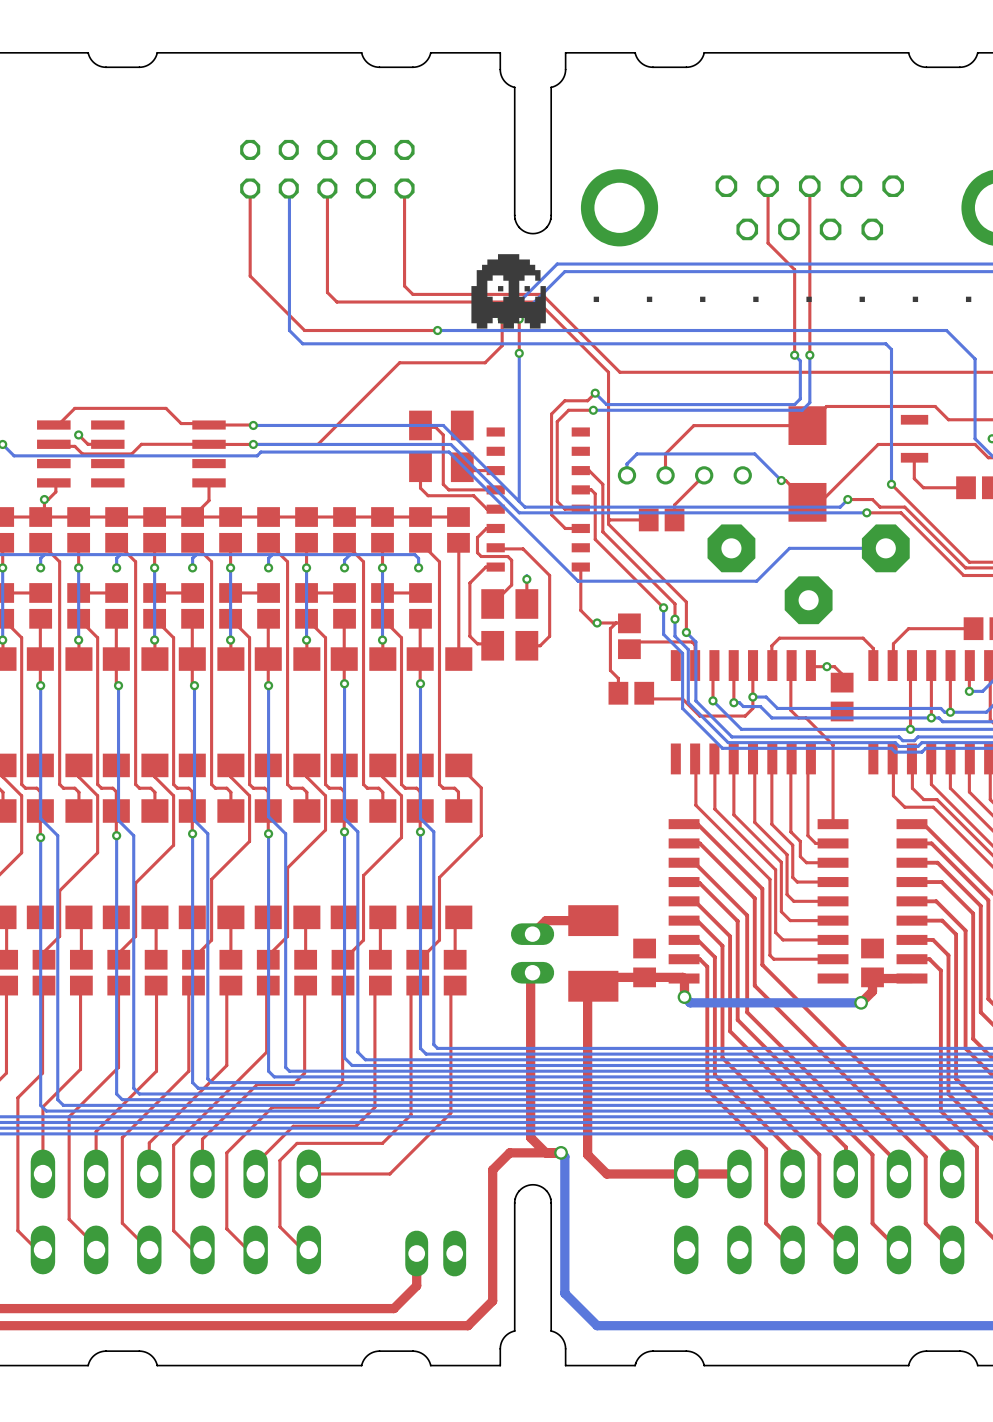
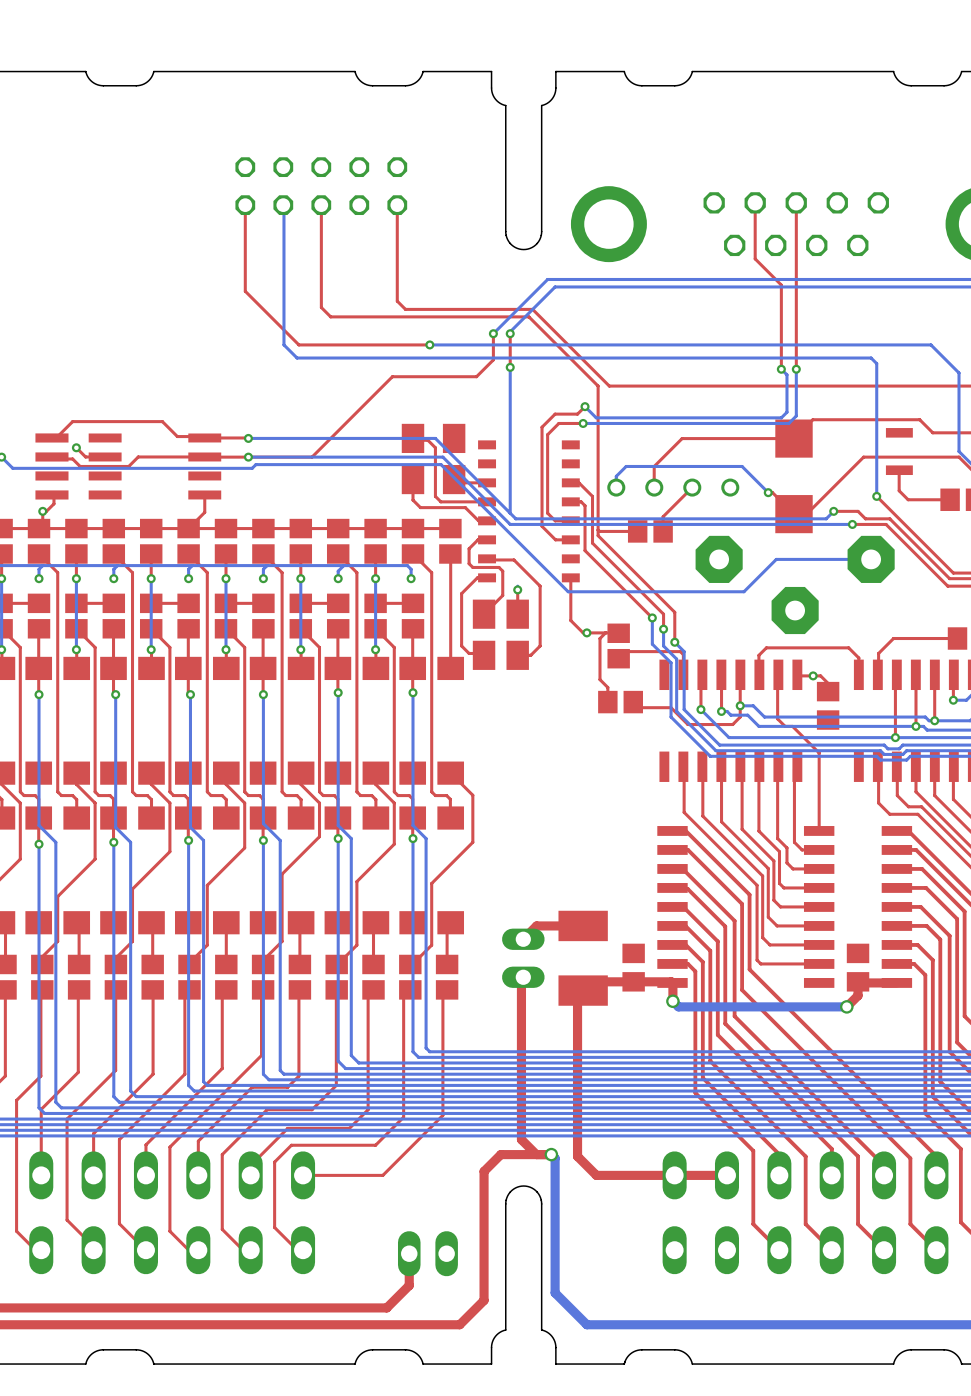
drawing: [471, 254, 546, 329] -> none
drawing: [593, 296, 600, 303] -> none
drawing: [646, 296, 653, 303] -> none
drawing: [700, 296, 706, 303] -> none
drawing: [753, 296, 759, 303] -> none
drawing: [806, 296, 812, 303] -> none
drawing: [859, 296, 865, 303] -> none
drawing: [912, 296, 919, 303] -> none
drawing: [965, 296, 972, 303] -> none

